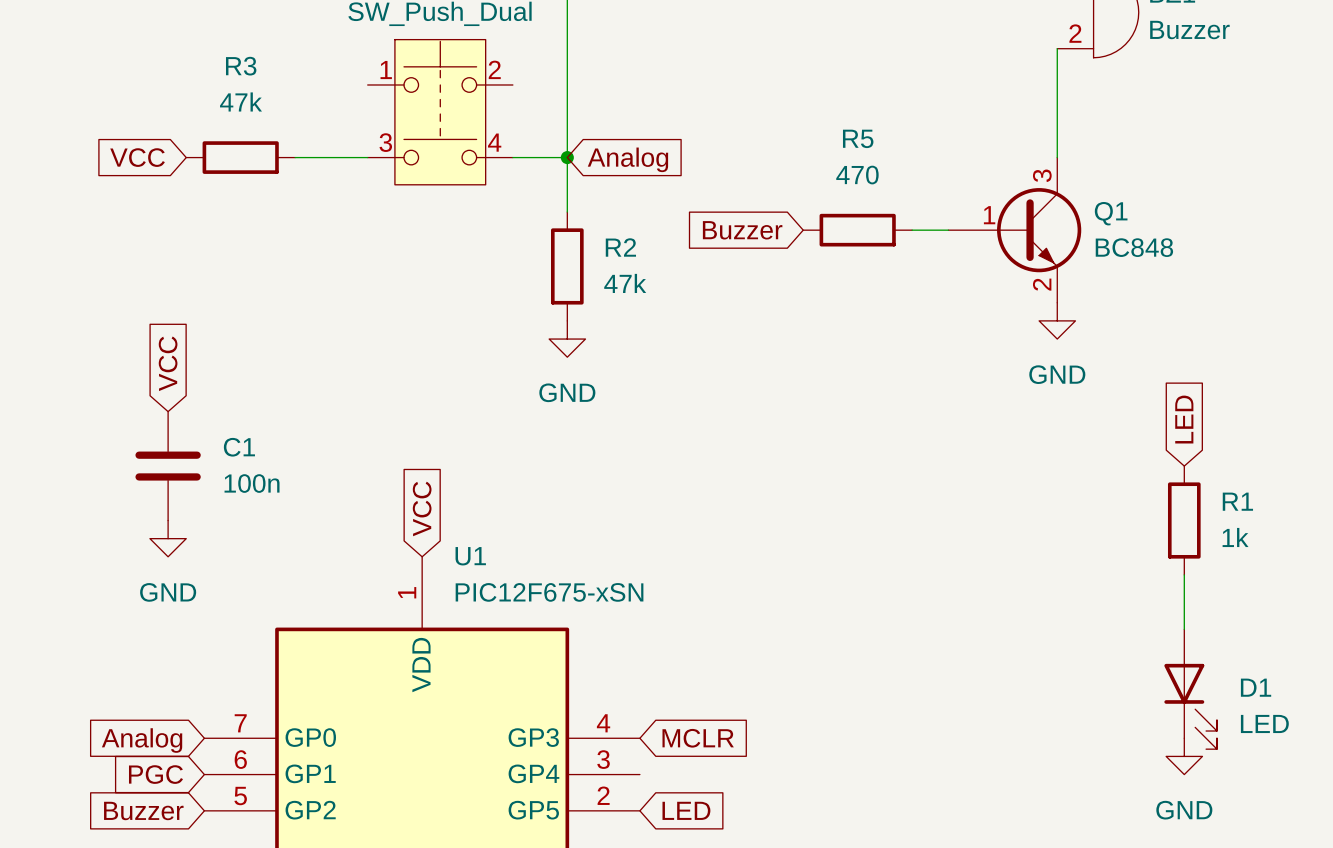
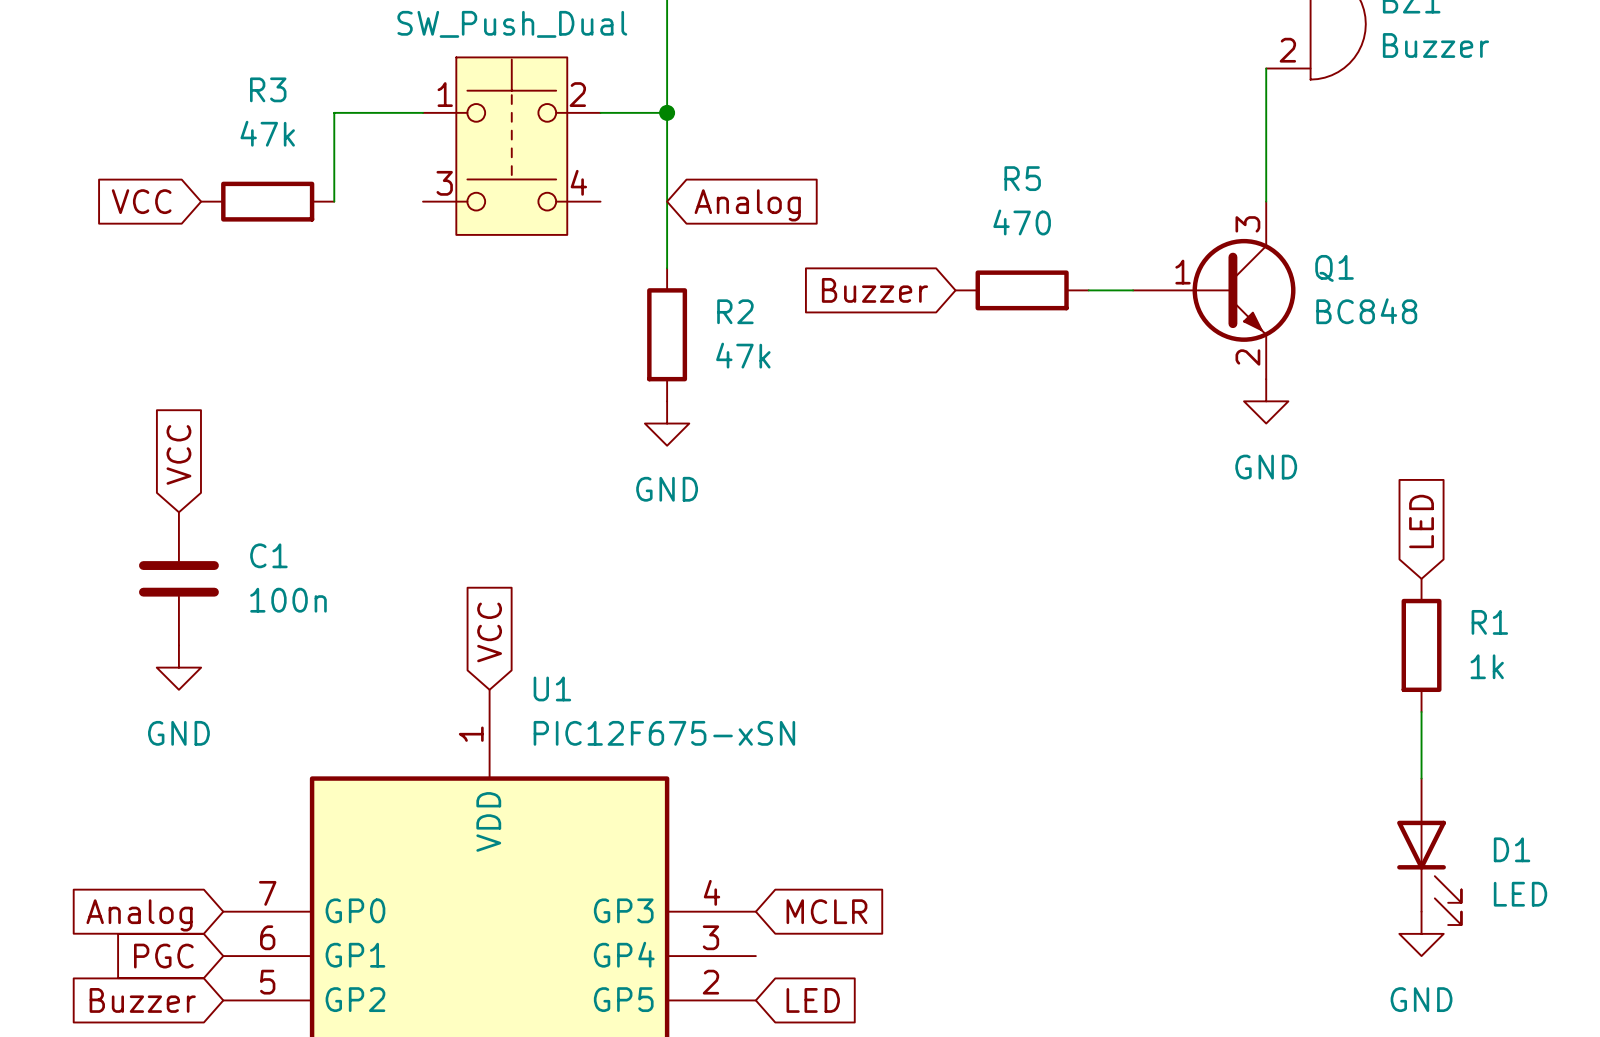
wire: (295, 157) (367, 157) -> (334, 201) (334, 112) (423, 112)
wire: (512, 157) (567, 157) -> (600, 112) (667, 112)
junction position: (567, 157) -> (667, 112)

